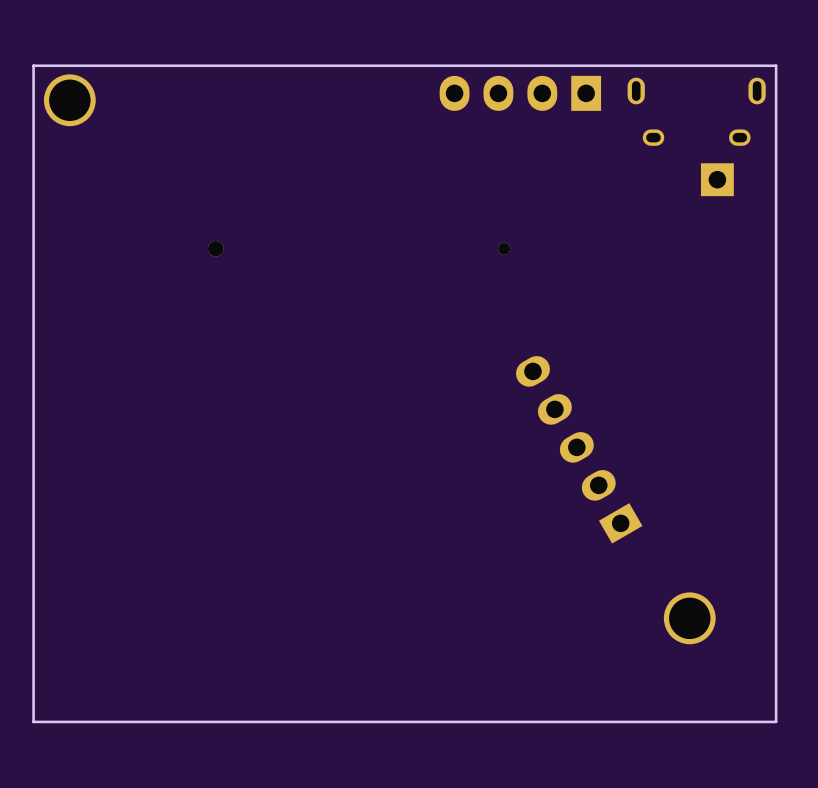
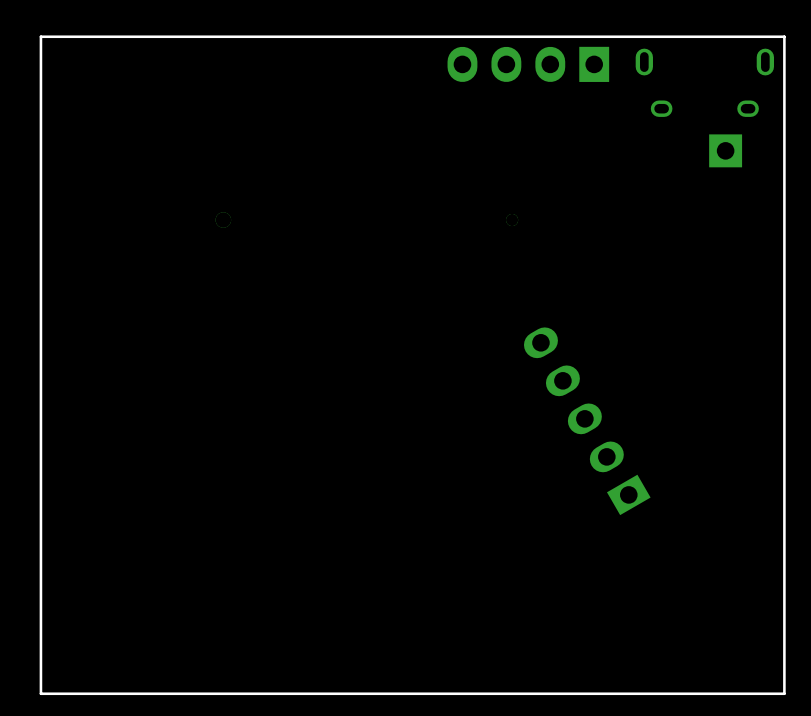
part: (69, 100) -> none
part: (689, 618) -> none

